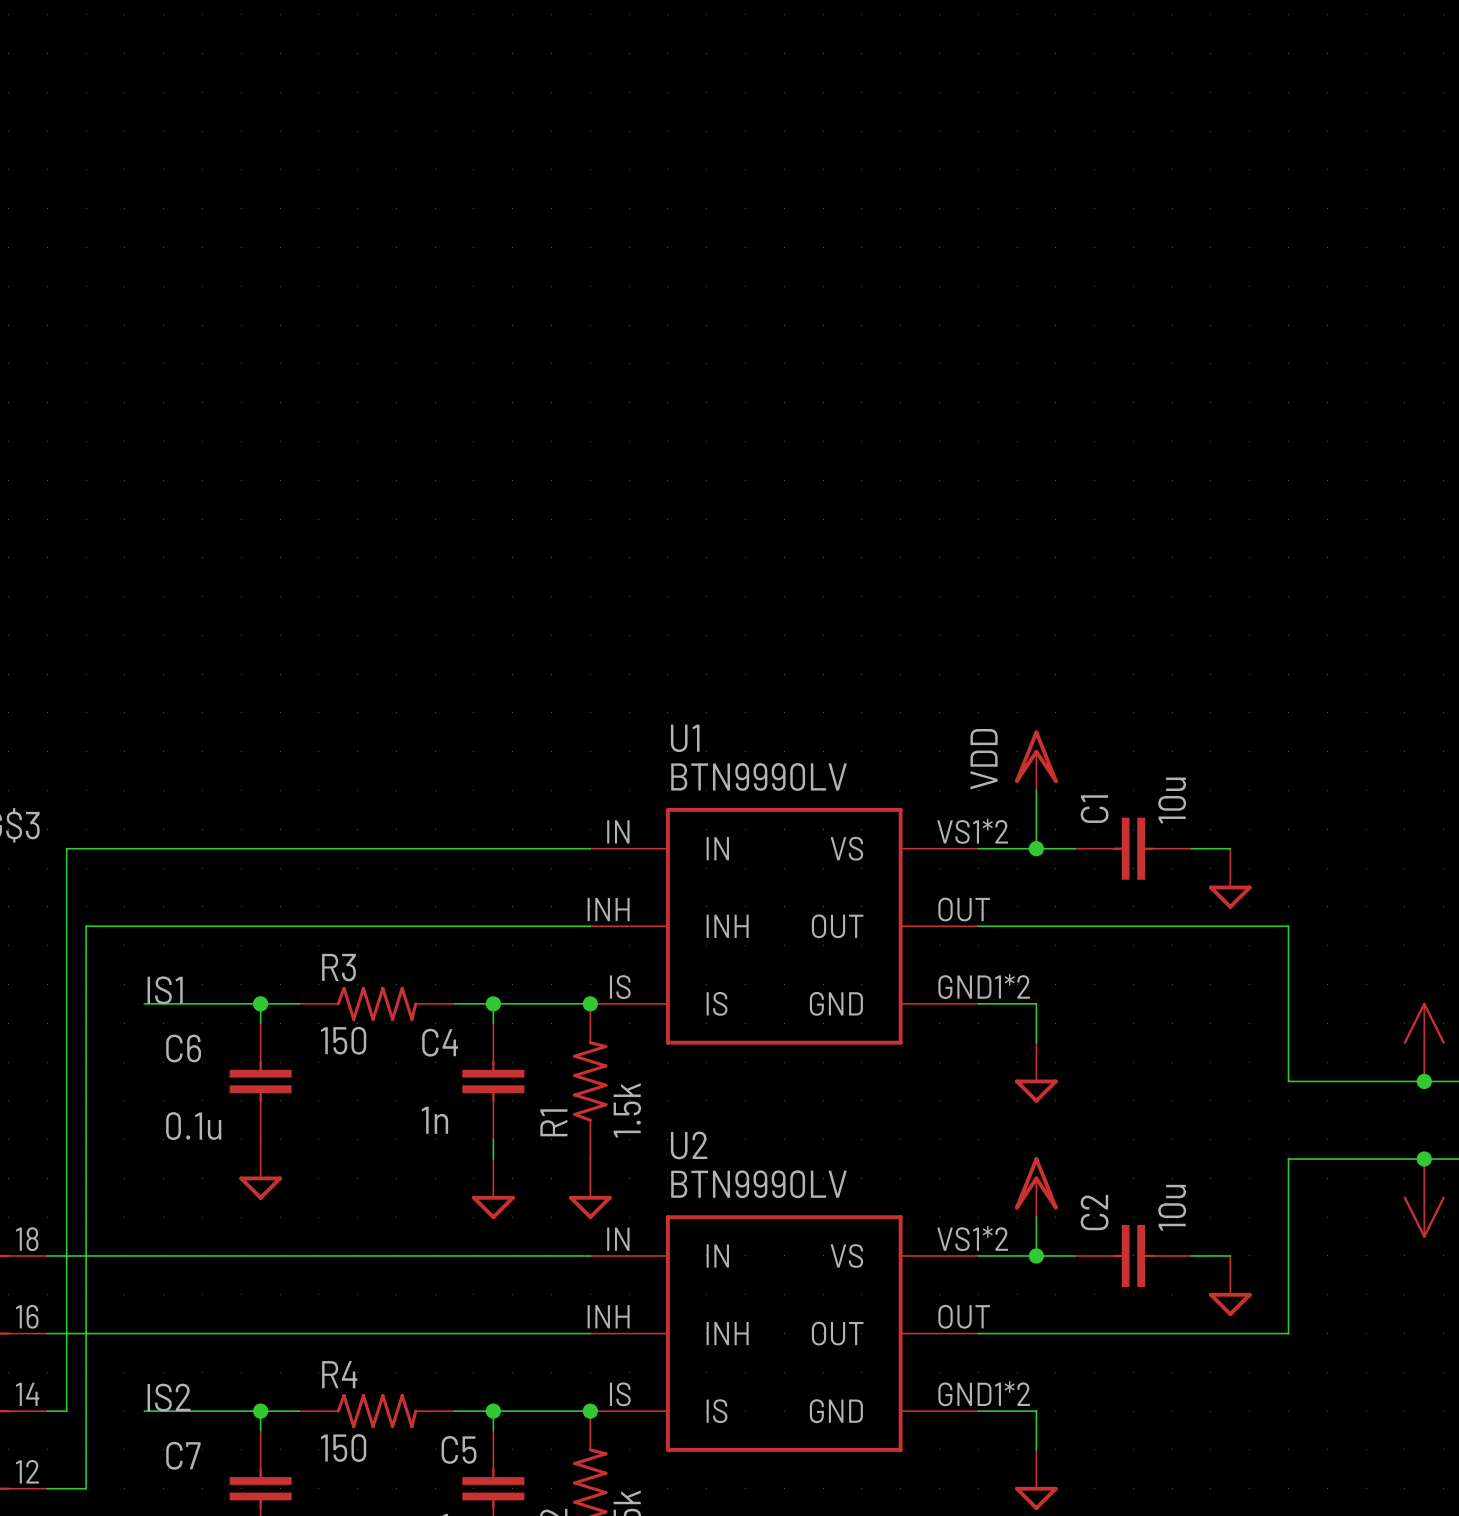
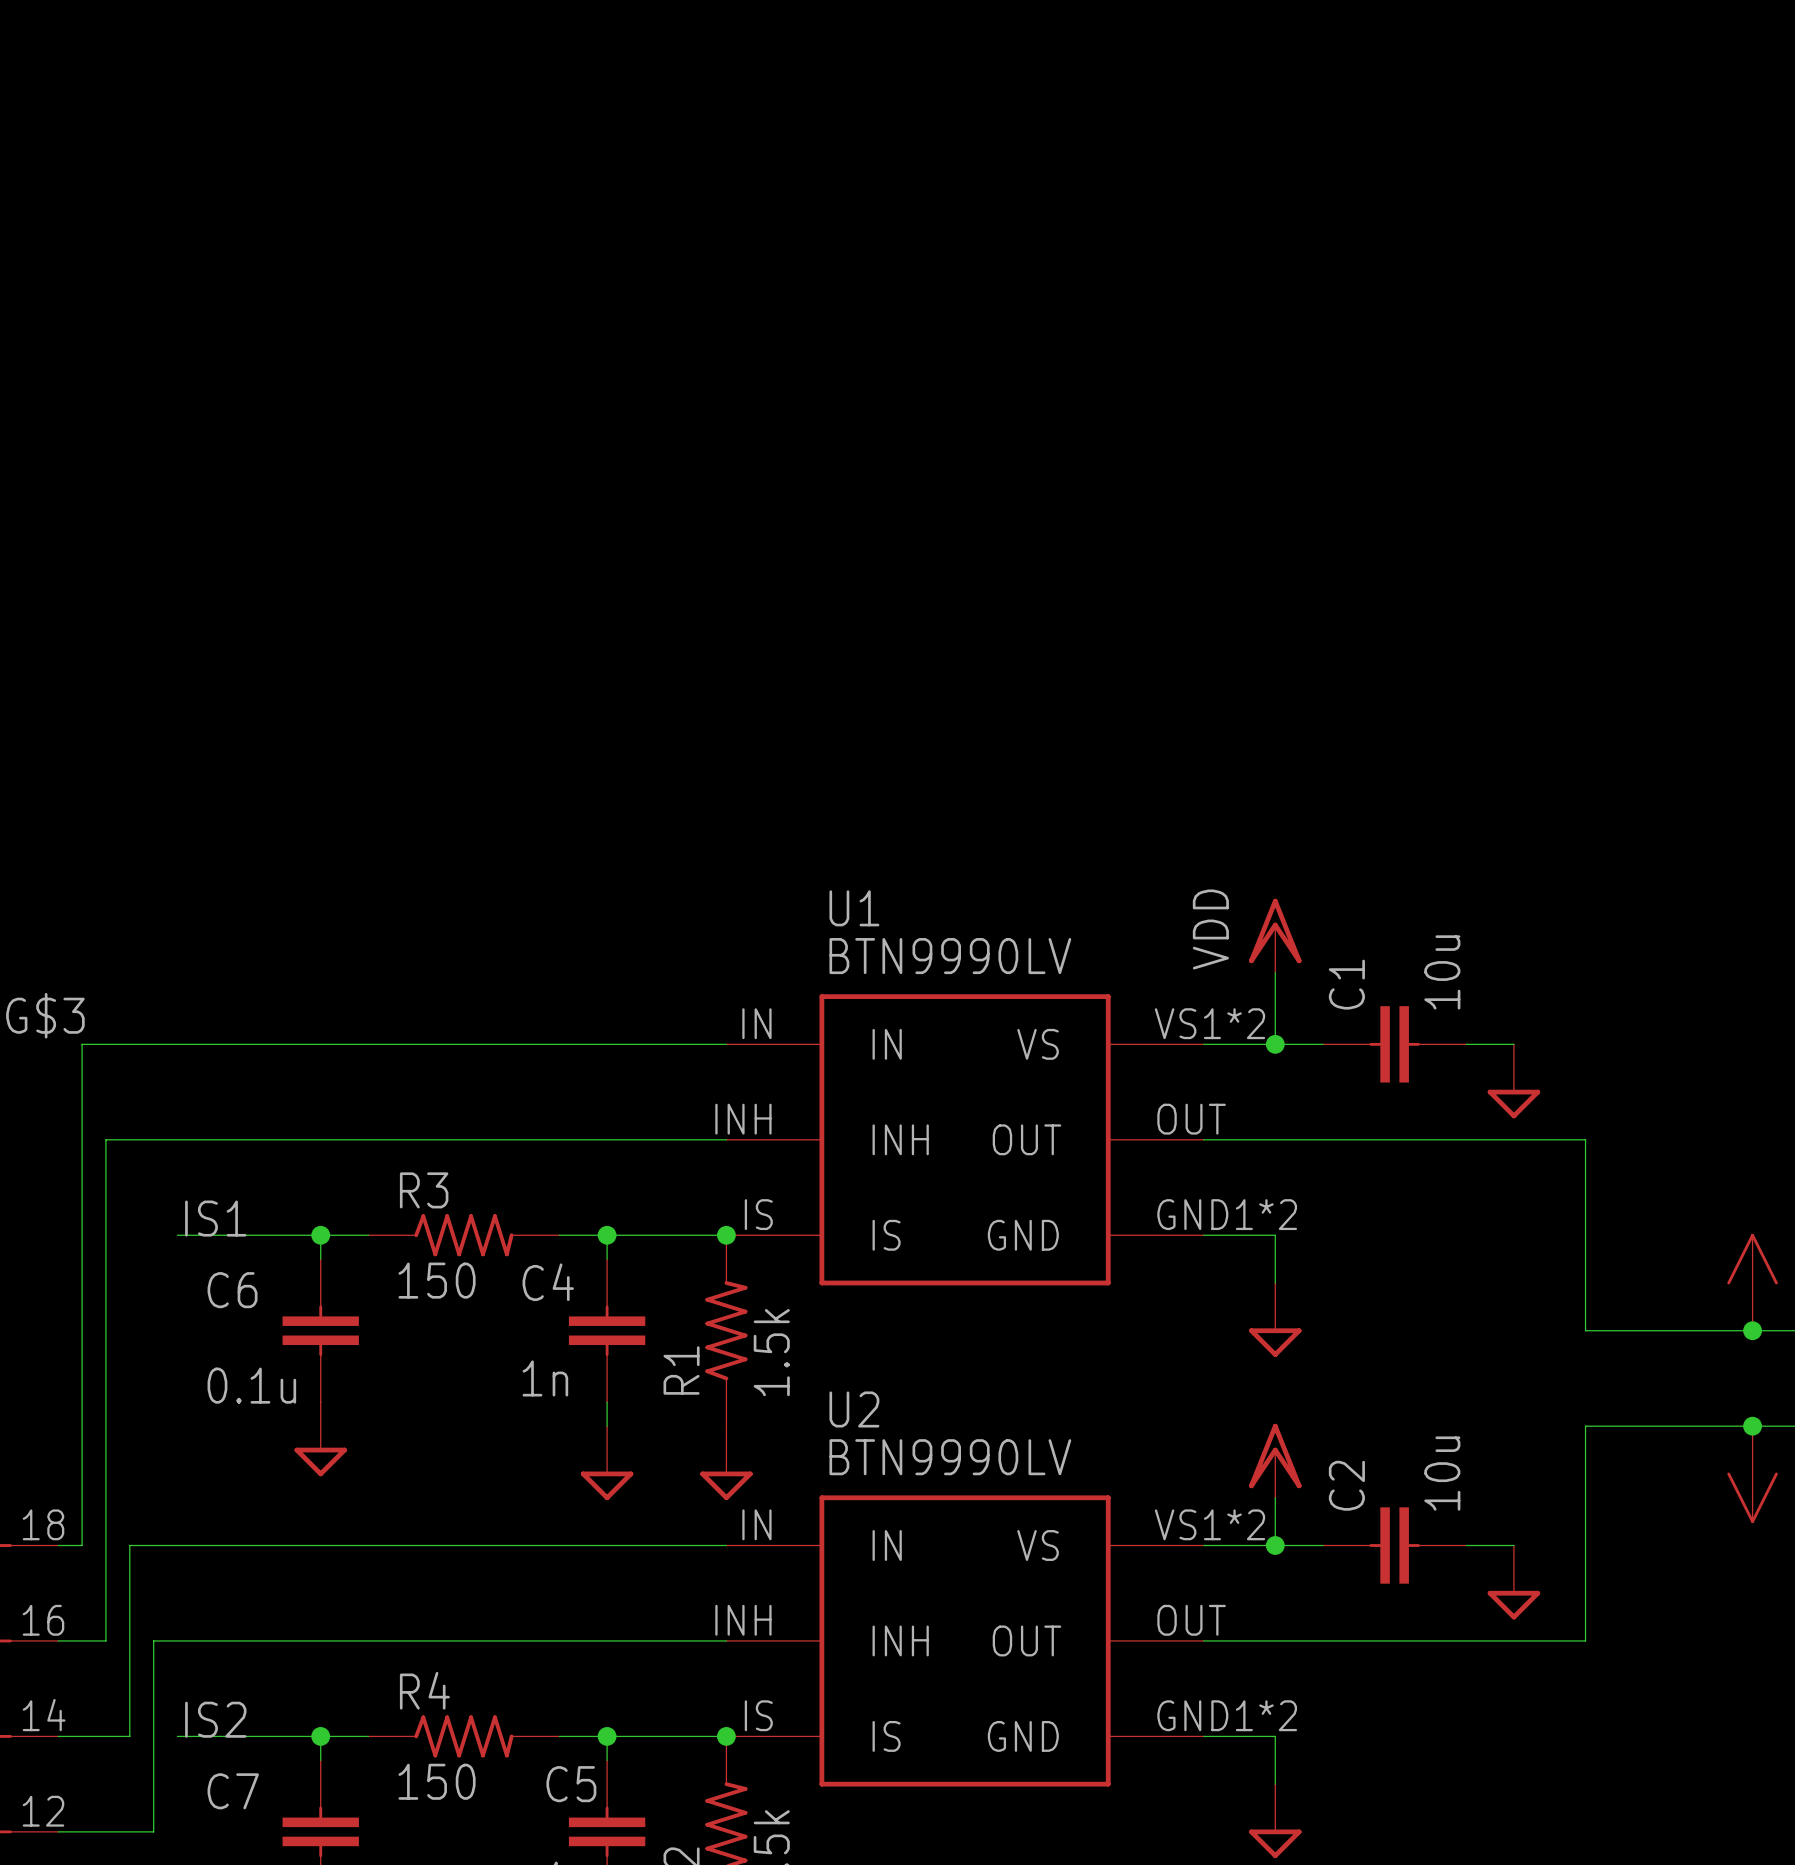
wire: (105, 1255) (66, 1255) (66, 1411) -> (129, 1545) (129, 1736) (82, 1736)
wire: (124, 1333) (86, 1333) (86, 1488) -> (153, 1640) (153, 1831) (105, 1831)

